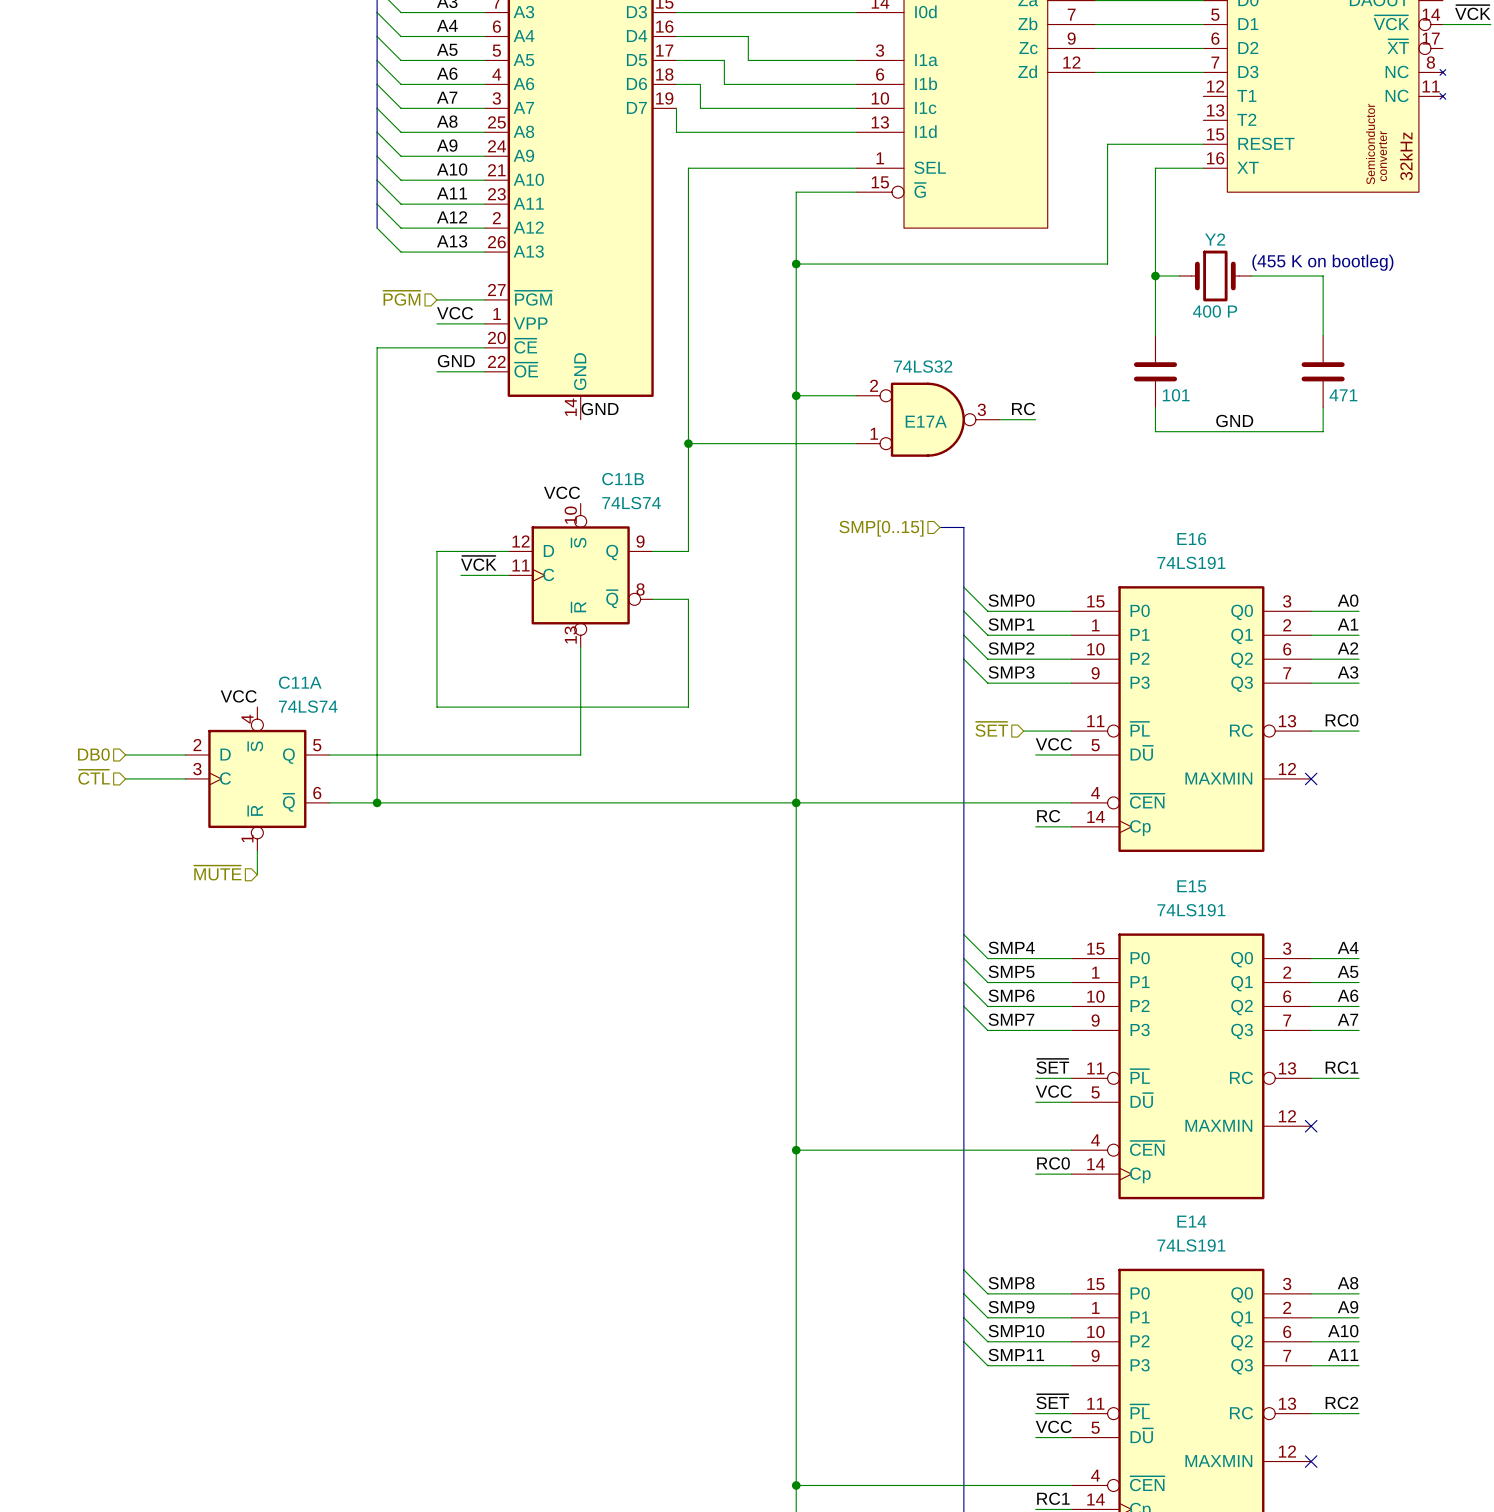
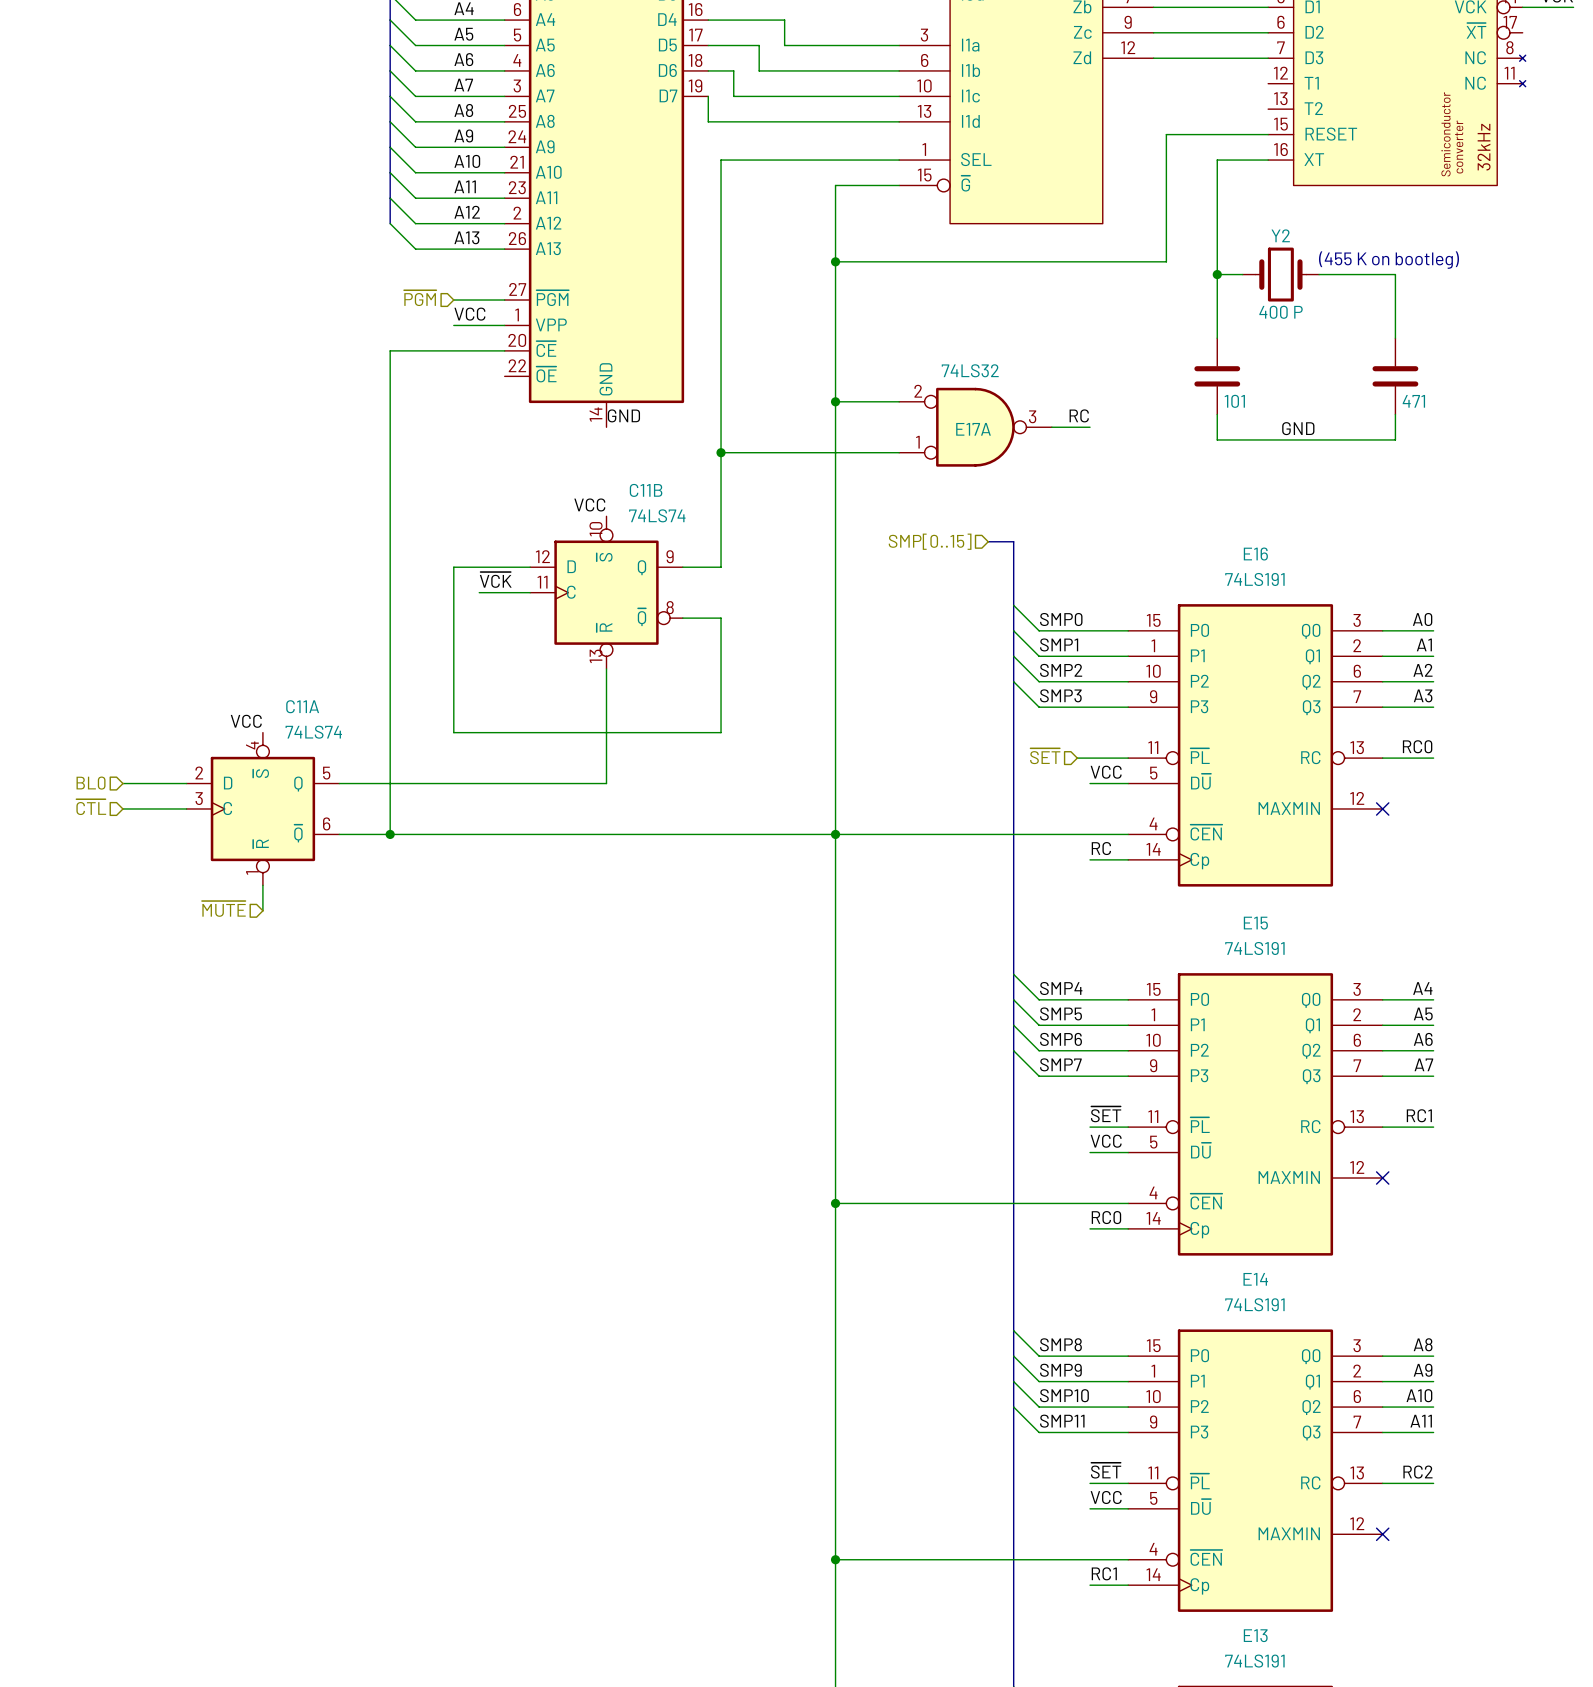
label: GND (456, 361) -> none
wire: (436, 371) (484, 371) -> none
hierarchical label: DB0 (93, 754) -> BL0 (91, 783)

